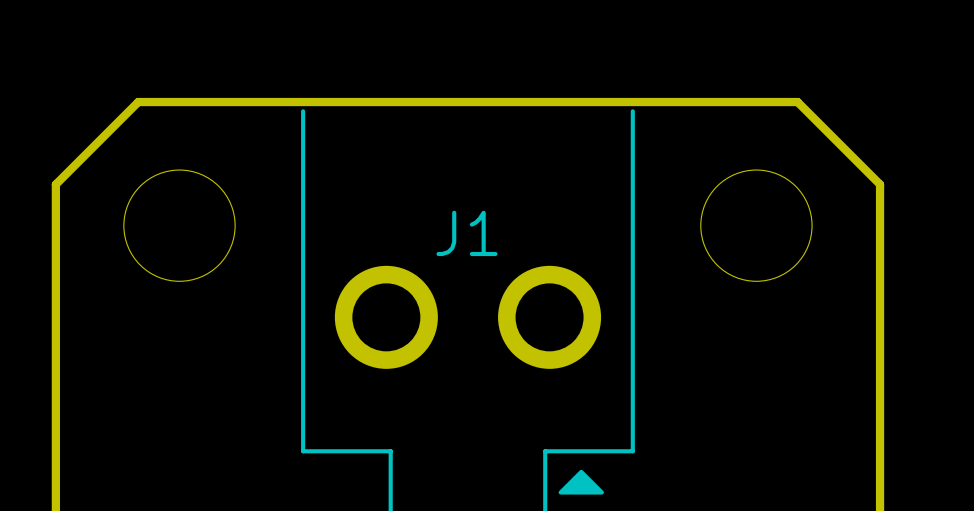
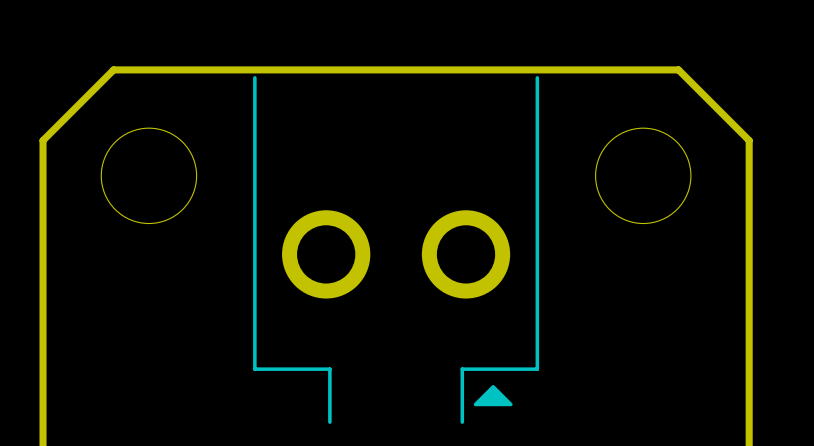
J1 name: J1 (466, 233) -> none

